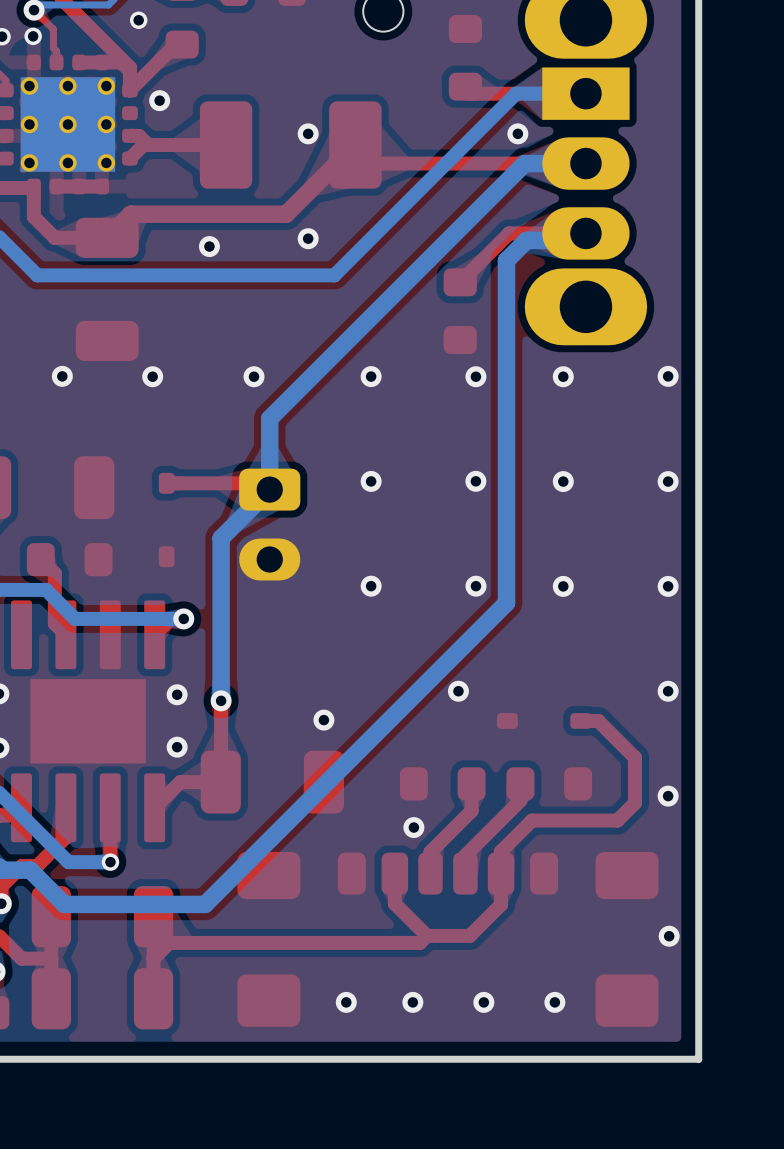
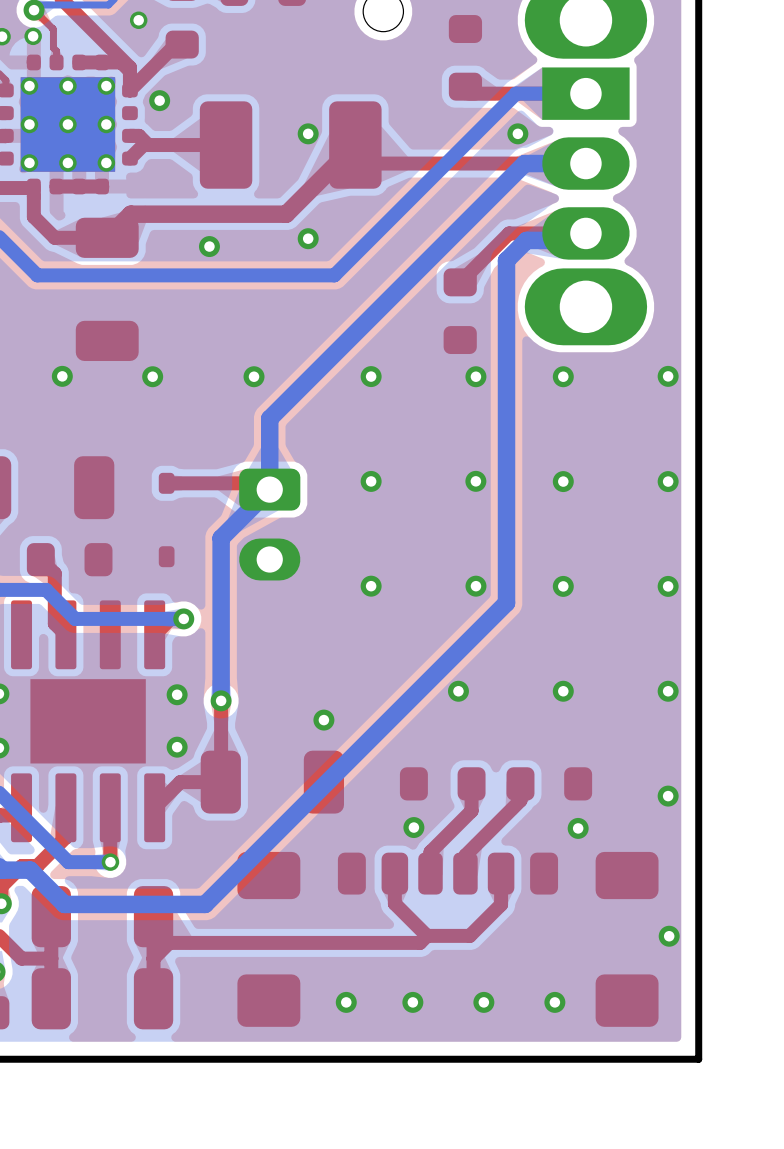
via: none -> (563, 691)
part: (544, 720) -> none
top track: (580, 720) (598, 720) (634, 757) (634, 803) (617, 820) (531, 820) (501, 851) (501, 873) -> none
via: none -> (578, 828)

